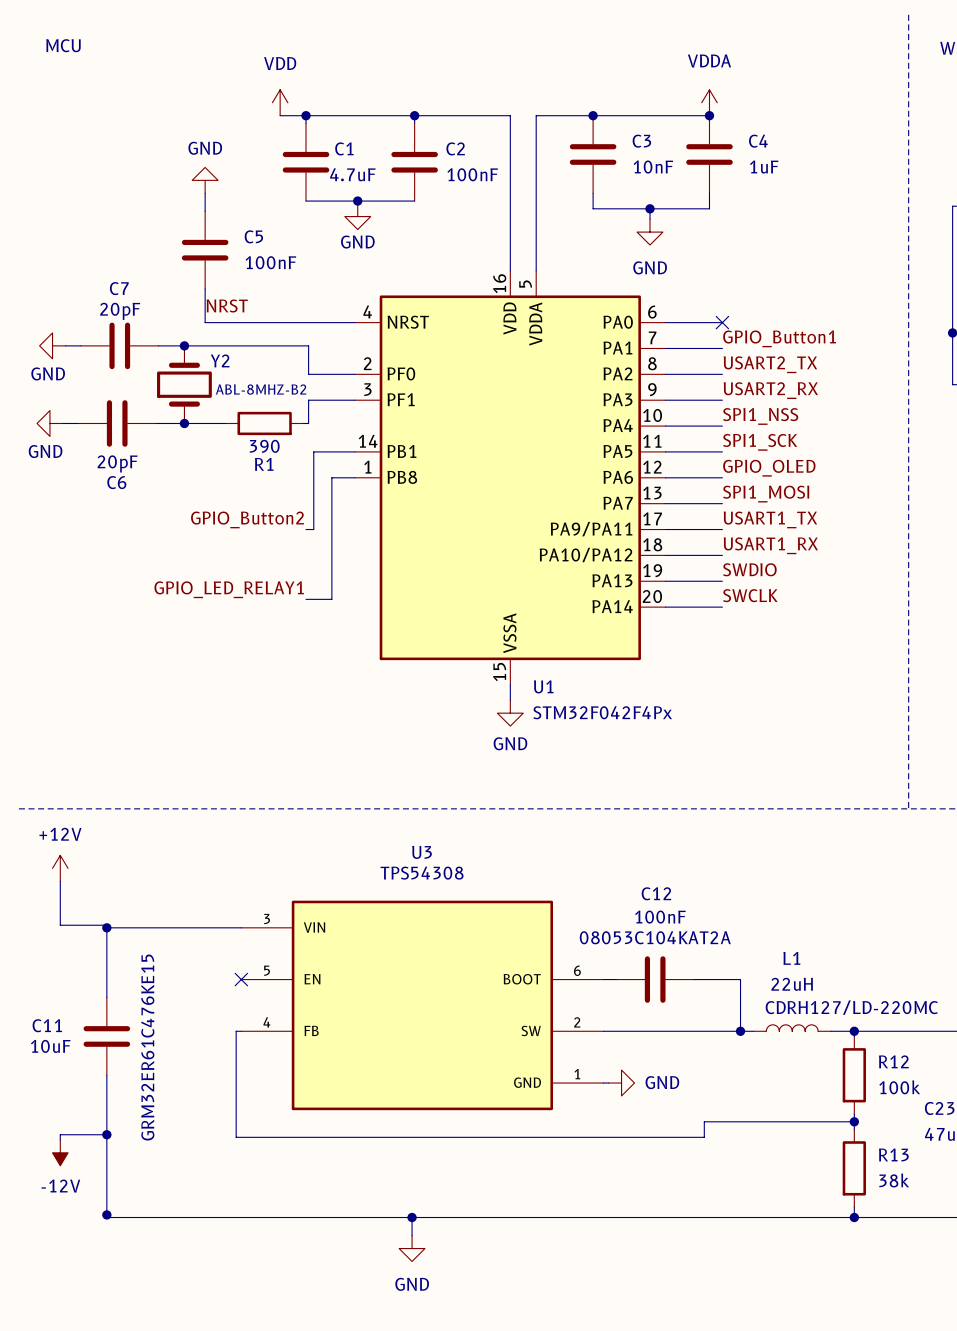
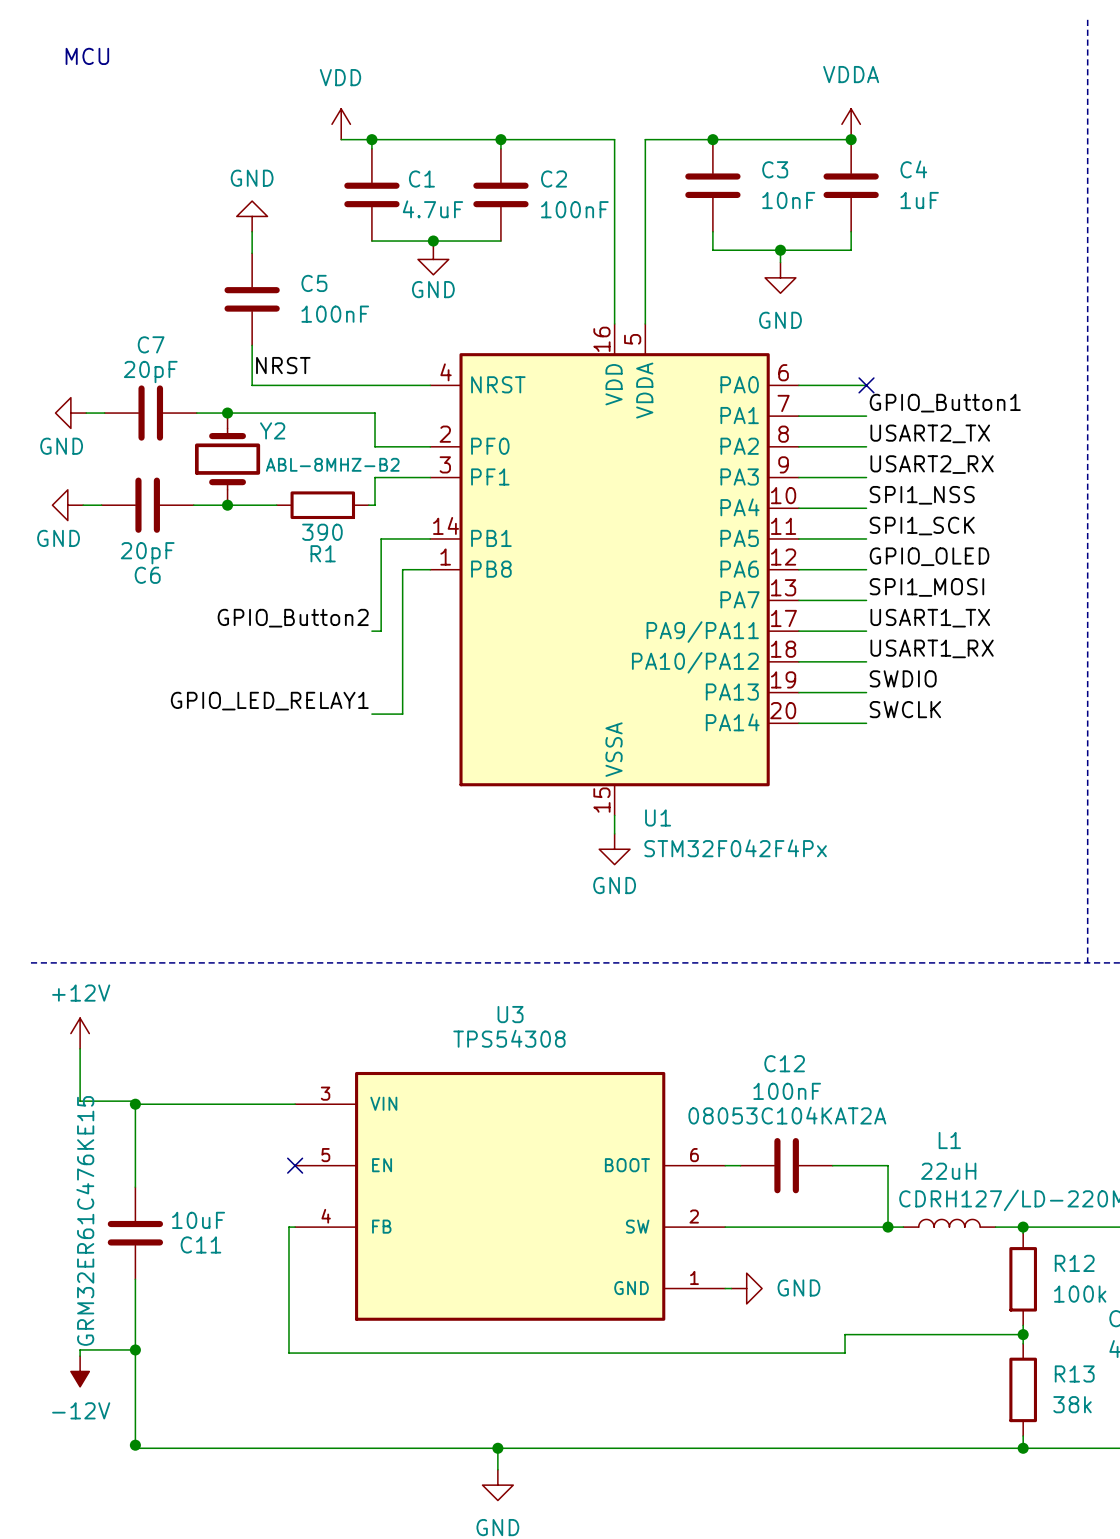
C11 name position: C11 (47, 1025) -> C11 (200, 1244)
C11 value position: 10uF (50, 1046) -> 10uF (198, 1220)
C11 text position: GRM32ER61C476KE15 (147, 1047) -> GRM32ER61C476KE15 (85, 1220)

